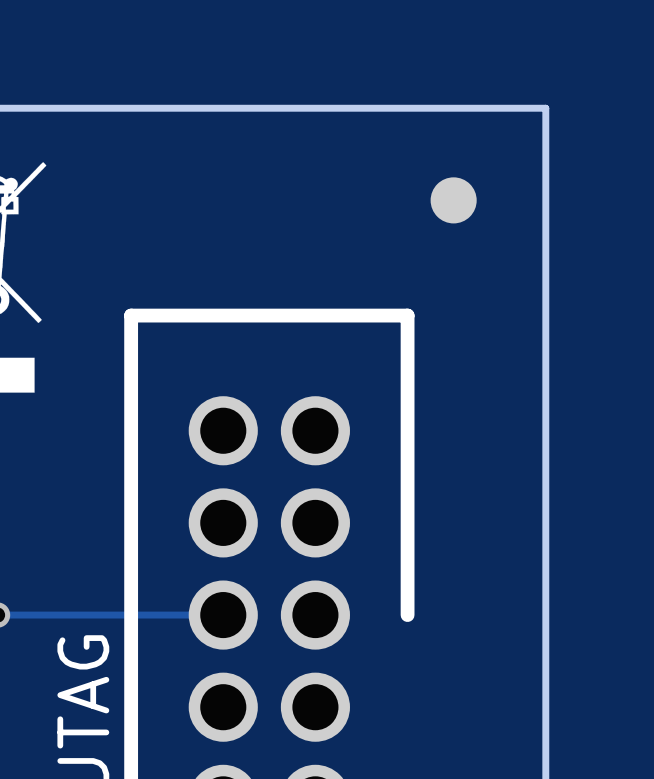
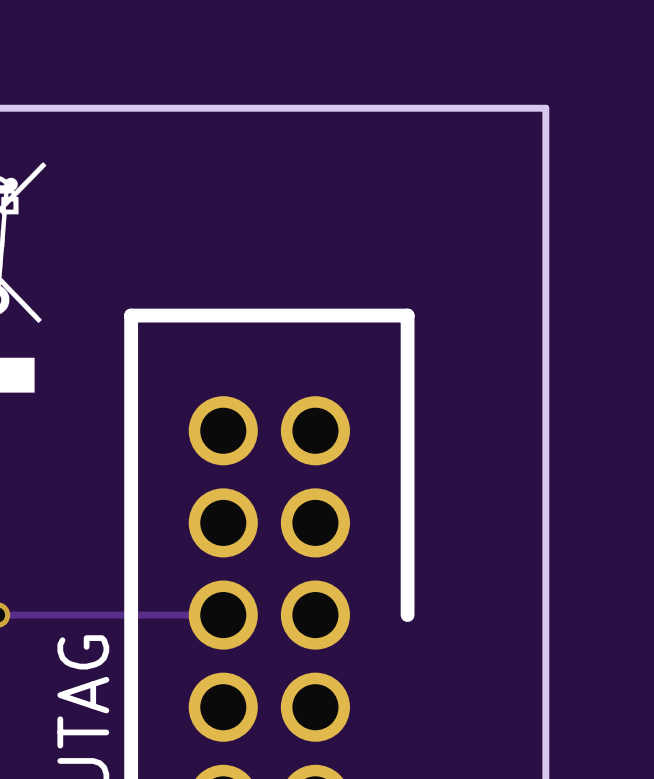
part: (453, 200) -> none

